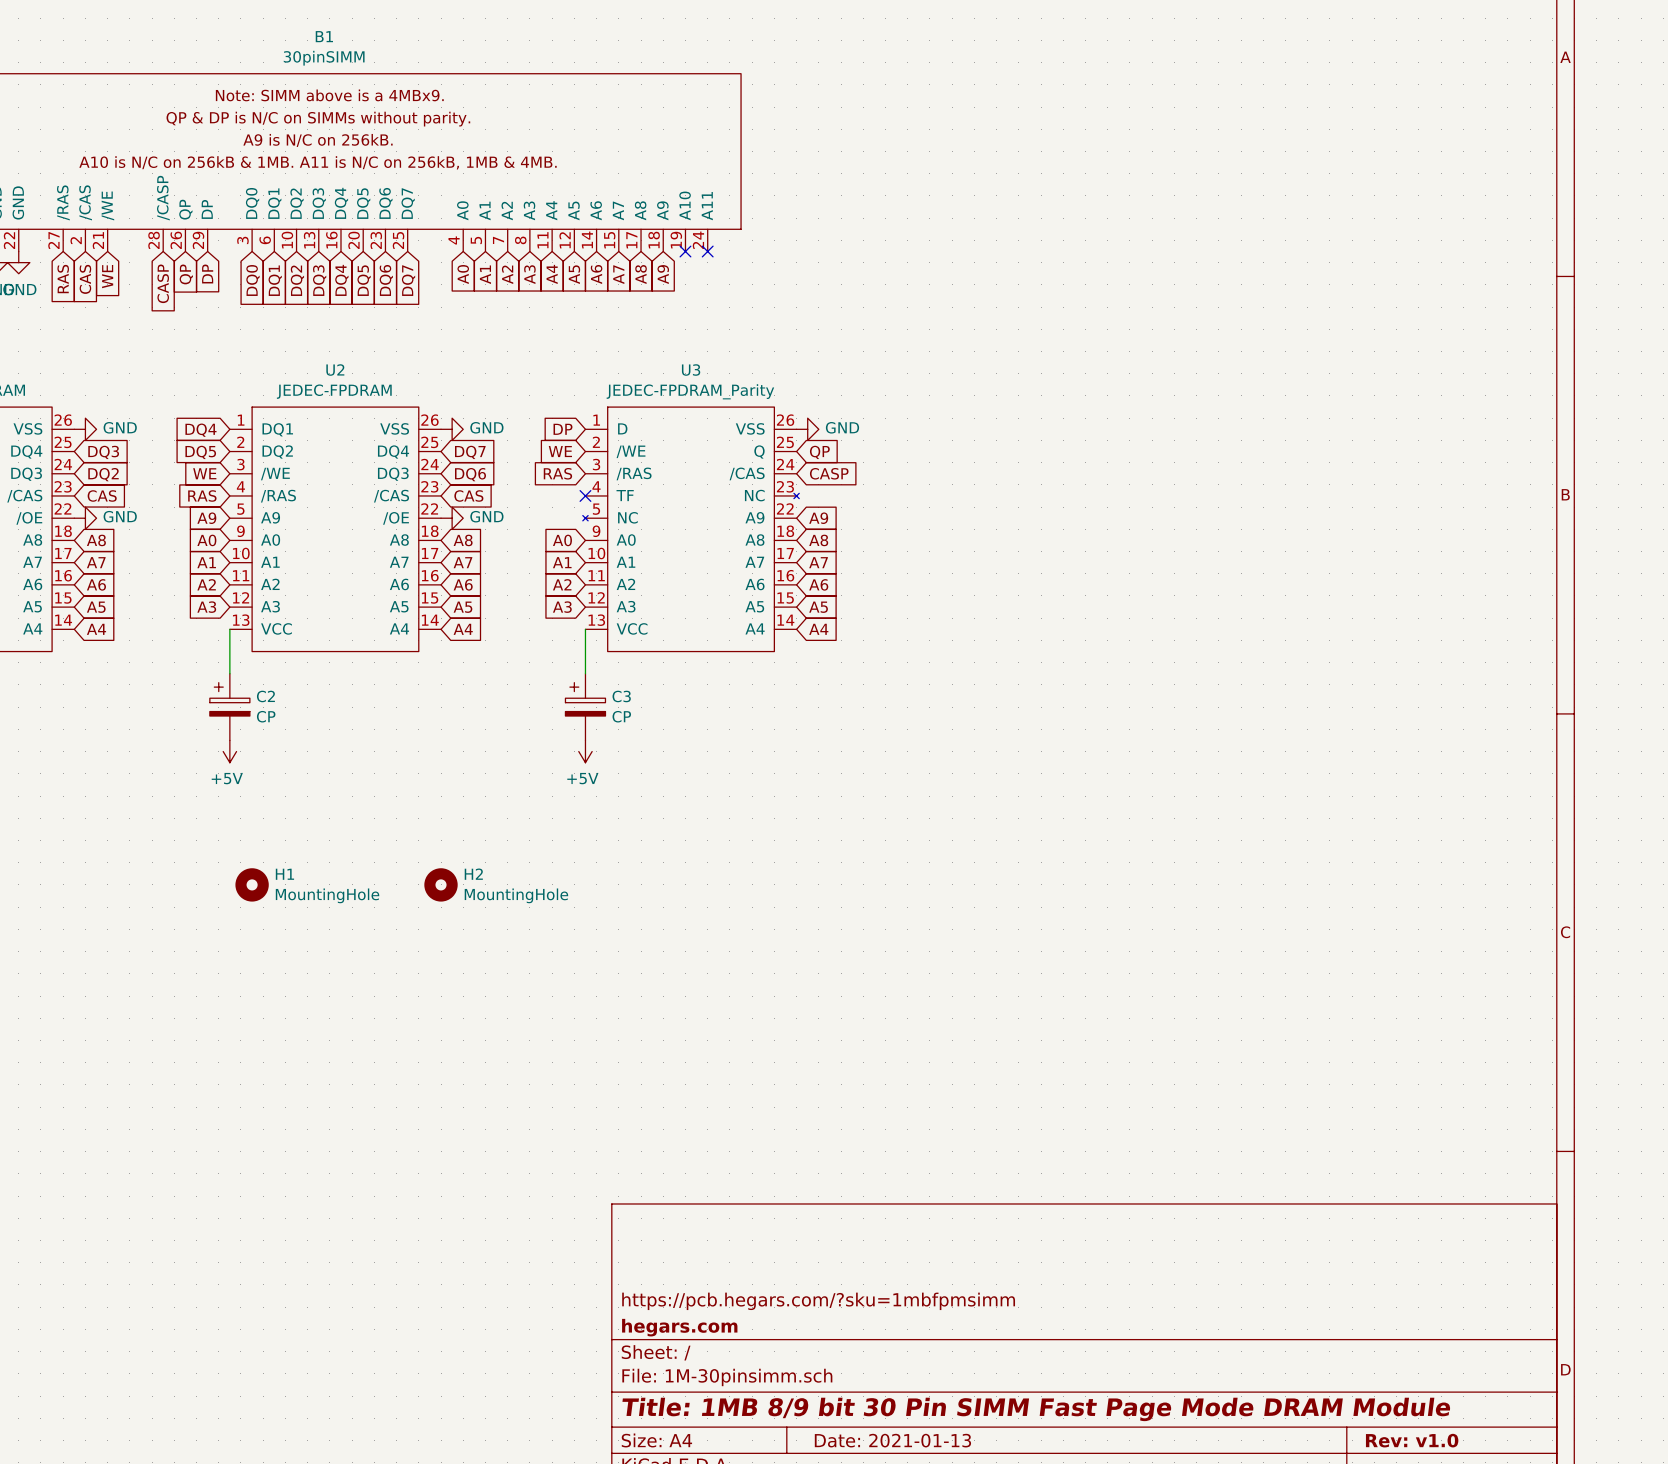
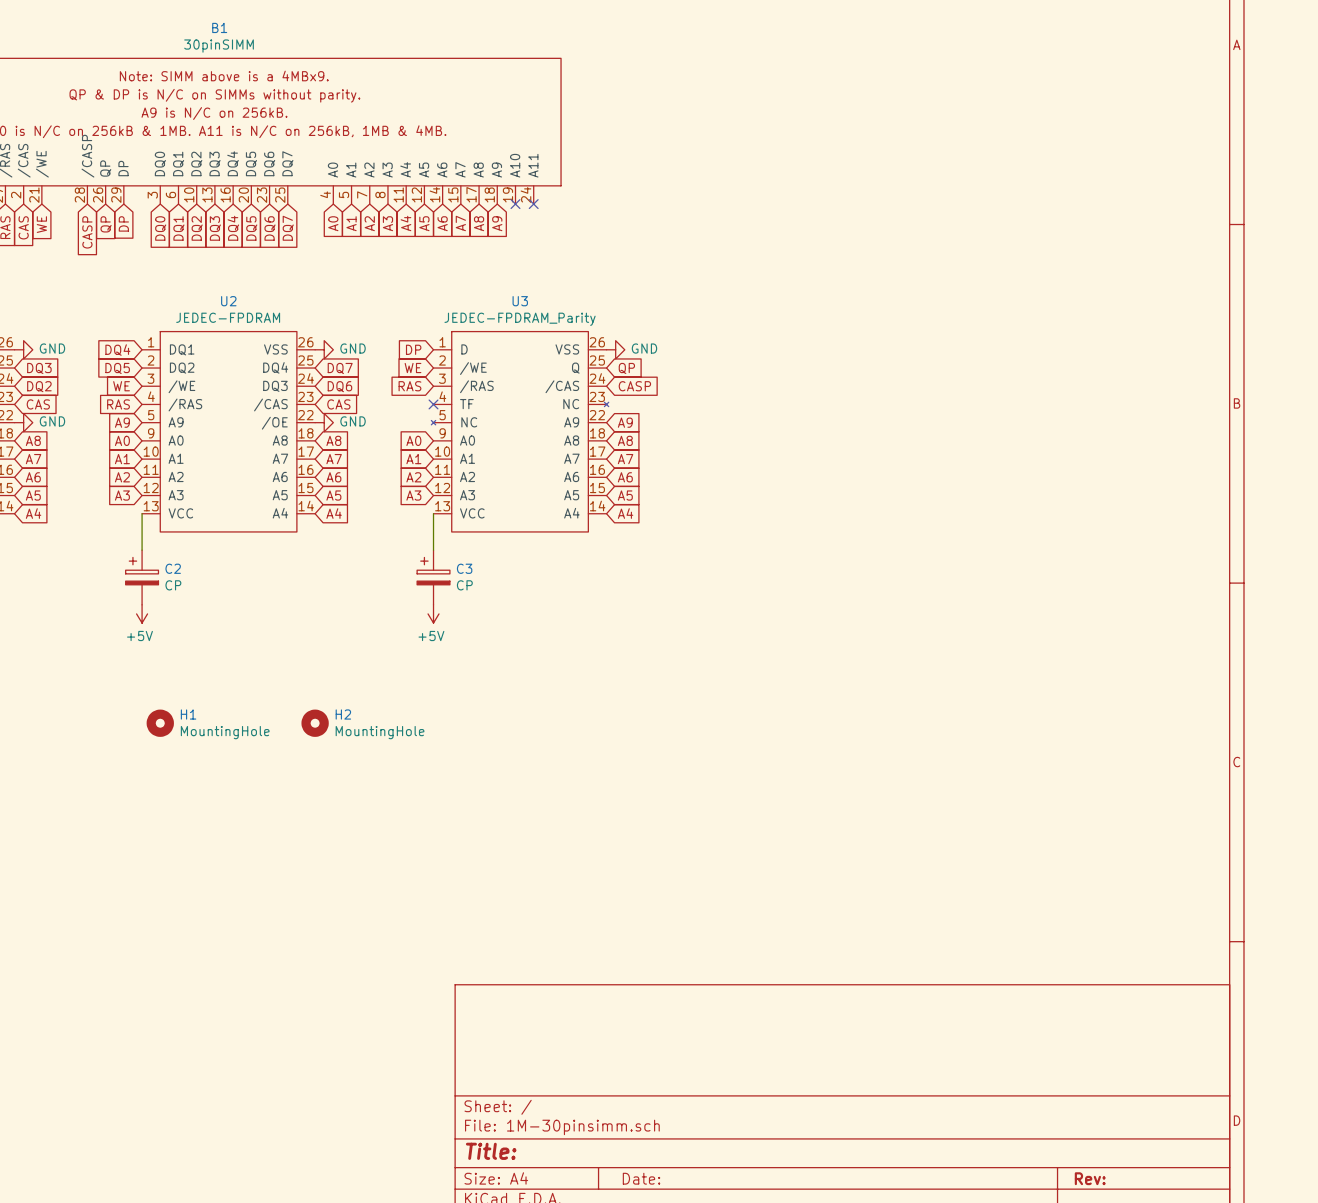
title block: https://pcb.hegars.com/?sku=1mbfpmsimm (818, 1301) -> none
title block: hegars.com (679, 1327) -> none
title block: Title: 1MB 8/9 bit 30 Pin SIMM Fast Page Mode DRAM Module (1036, 1409) -> Title: (491, 1151)
title block: Date: 2021-01-13 (892, 1440) -> Date: (641, 1178)
title block: Rev: v1.0 (1412, 1440) -> Rev: (1090, 1178)

